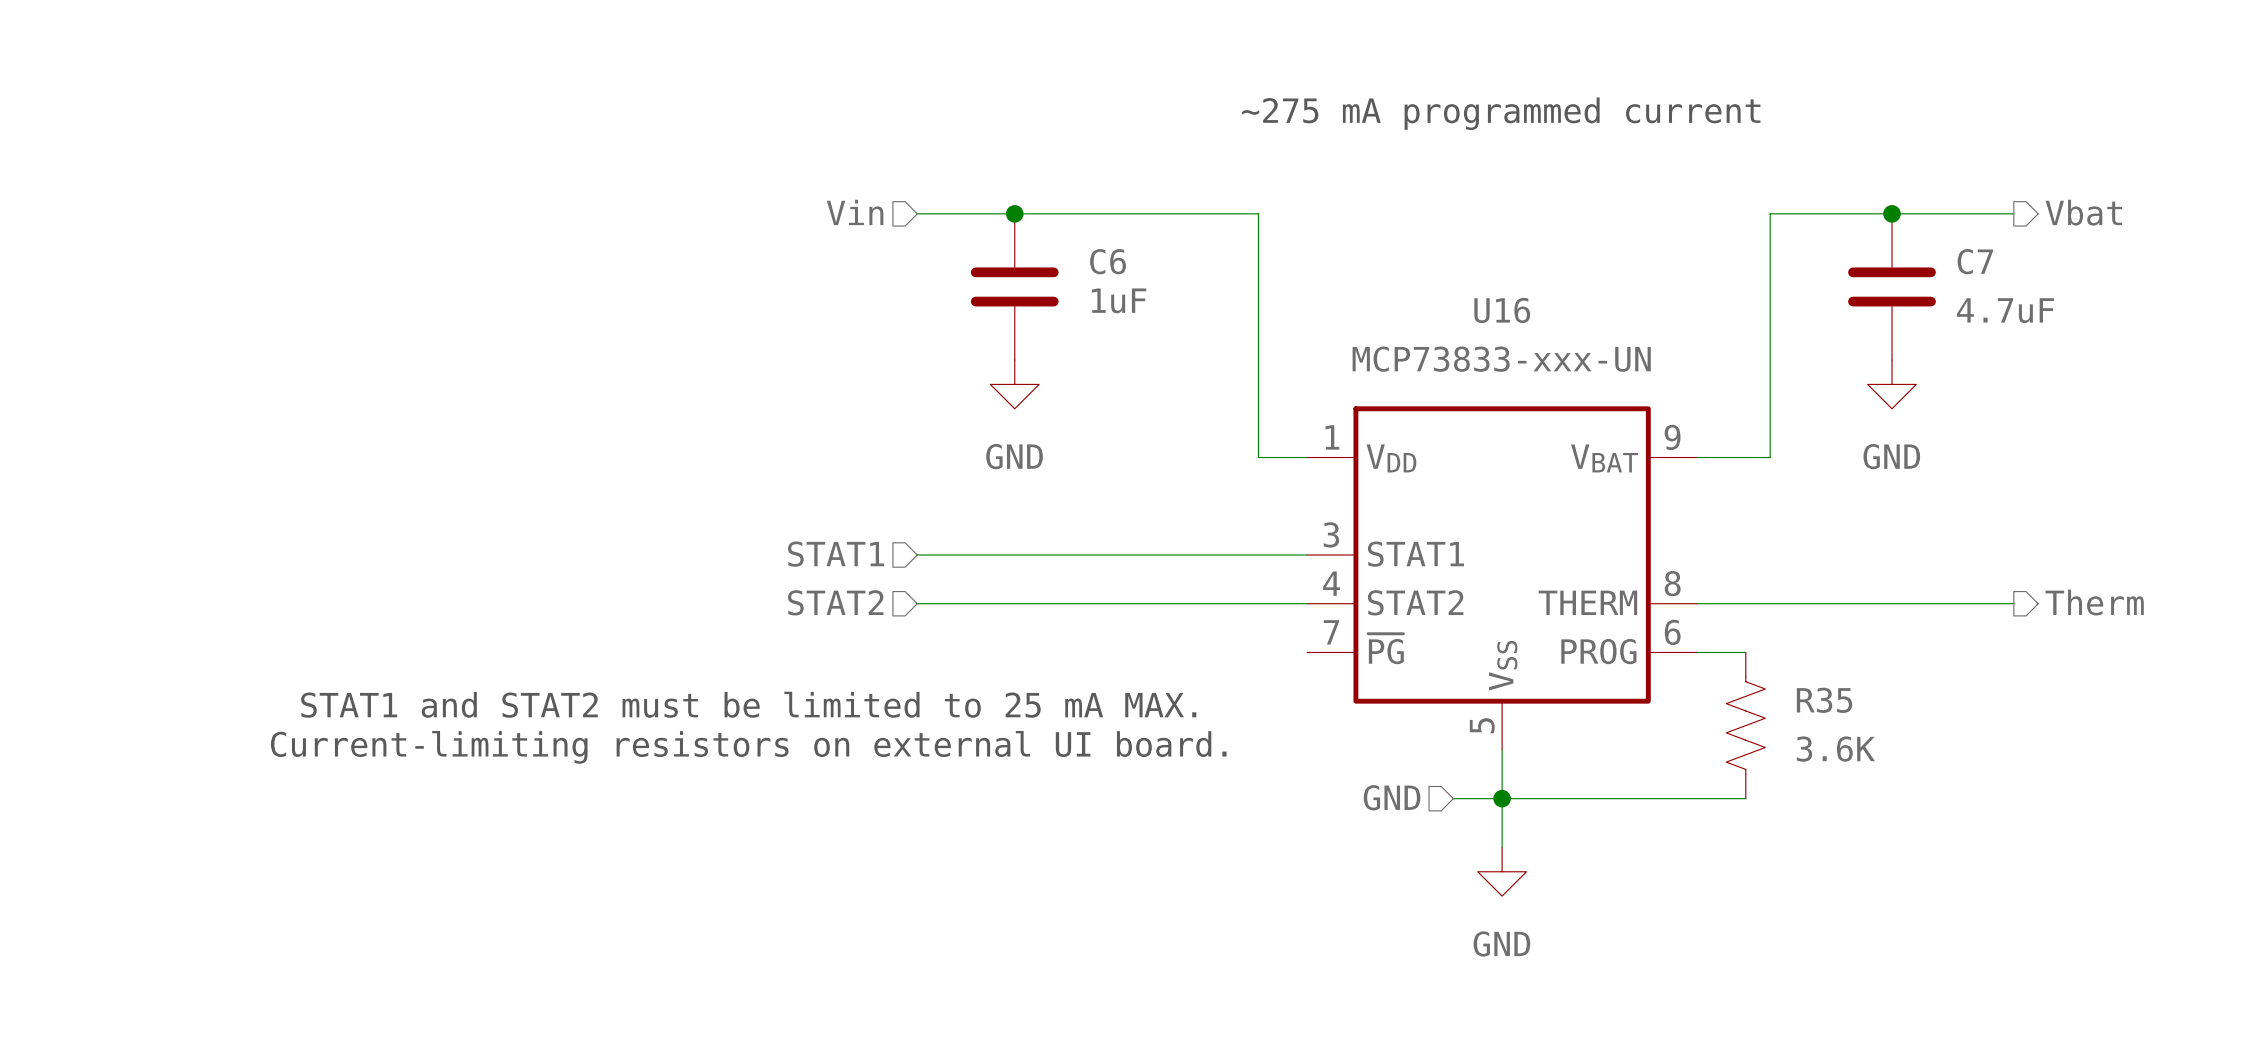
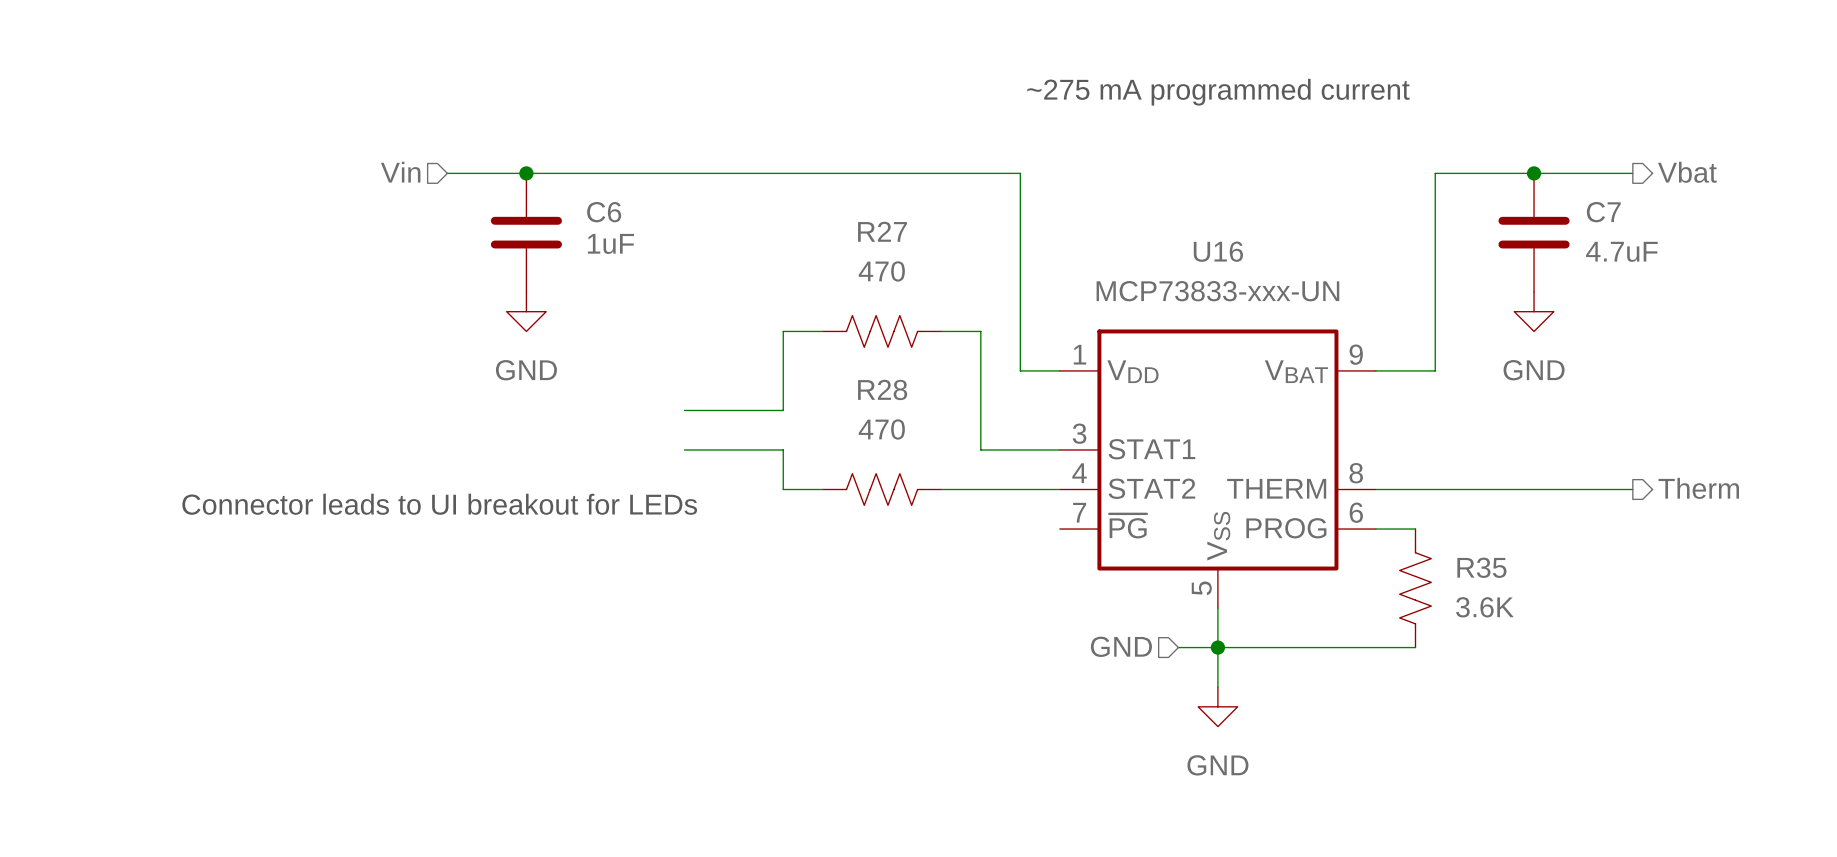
hierarchical label position: Vin (855, 212) -> Vin (400, 172)
wire: none -> (447, 173) (743, 173)
junction: none -> (526, 173)
junction: (1014, 213) -> none
C6 position: (1014, 286) -> (526, 232)
power symbol position: GND (1014, 384) -> GND (526, 311)
wire: none -> (822, 331) (783, 331) (783, 410) (684, 410)
R27: none -> 470 (882, 331)
hierarchical label: STAT1 (836, 554) -> none
wire: none -> (684, 449) (743, 449)
wire: (966, 554) (1209, 554) -> (941, 331) (980, 331) (980, 449)
hierarchical label: STAT2 (835, 602) -> none
wire: (917, 603) (966, 603) -> (783, 449) (783, 489)
wire: (1014, 603) (1160, 603) -> none
R28: none -> 470 (882, 489)
text: none -> Connector leads to UI breakout for LEDs (439, 504)
text: STAT1 and STAT2 must be limited to 25 mA MAX. (748, 704) -> none
text: Current-limiting resistors on external UI board. (748, 747) -> none

